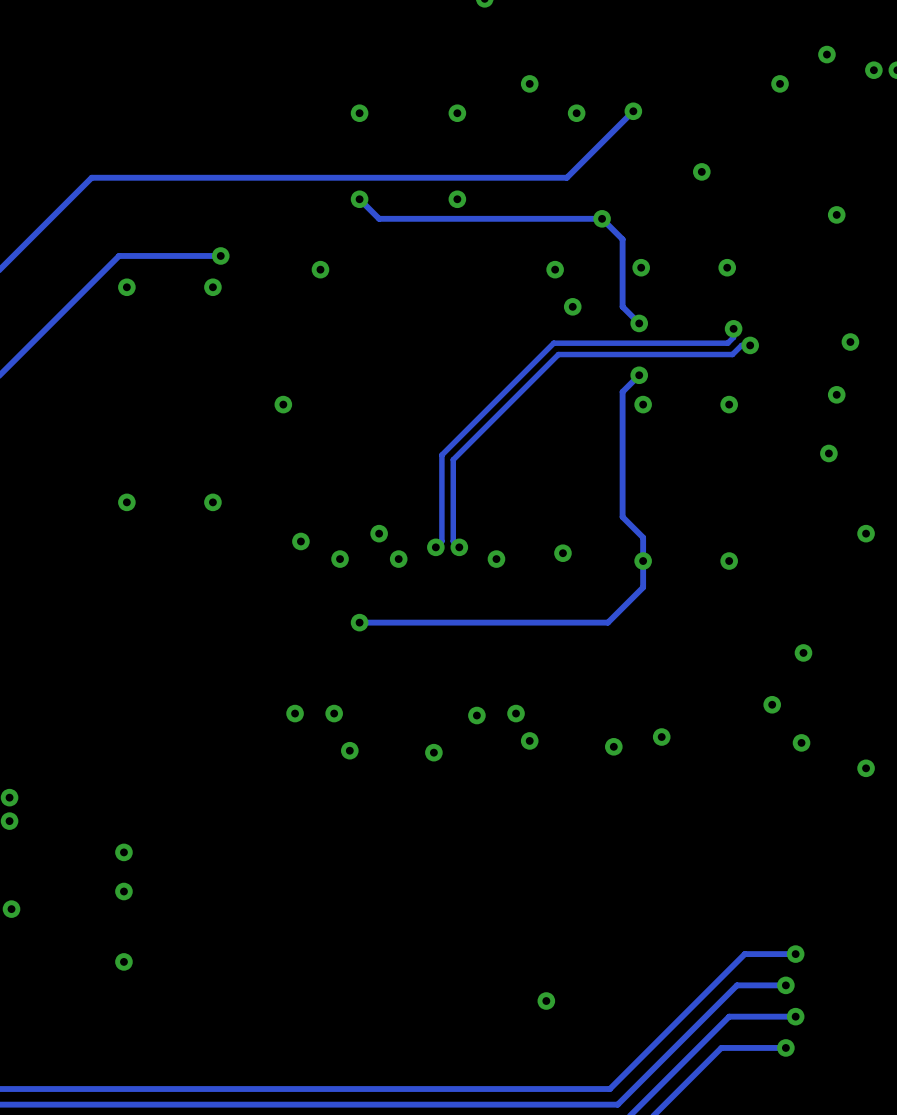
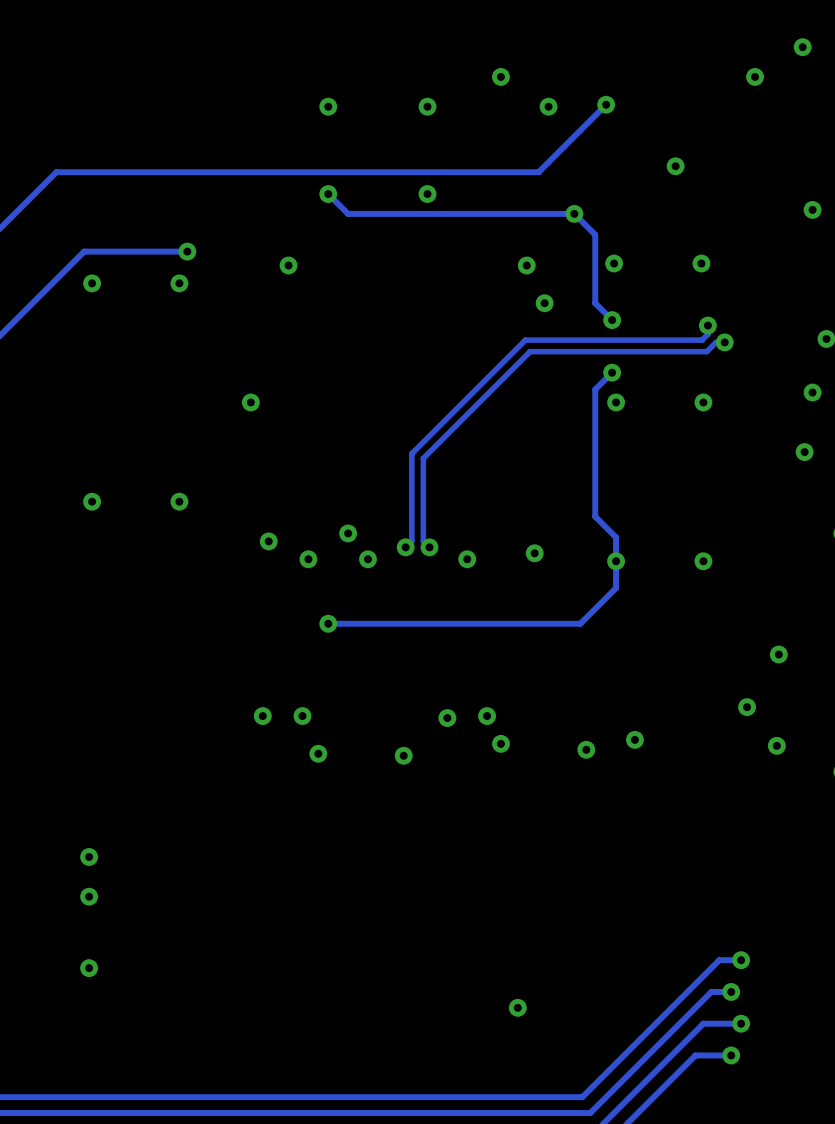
via: none -> (741, 960)
track: (795, 954) (766, 954) -> none
via: (795, 954) -> none
via: none -> (731, 991)
track: (785, 985) (756, 985) -> none
via: (785, 985) -> none
via: none -> (741, 1023)
track: (795, 1016) (766, 1016) -> none
via: (795, 1016) -> none
via: none -> (731, 1055)
track: (785, 1047) (756, 1047) -> none
via: (785, 1047) -> none

